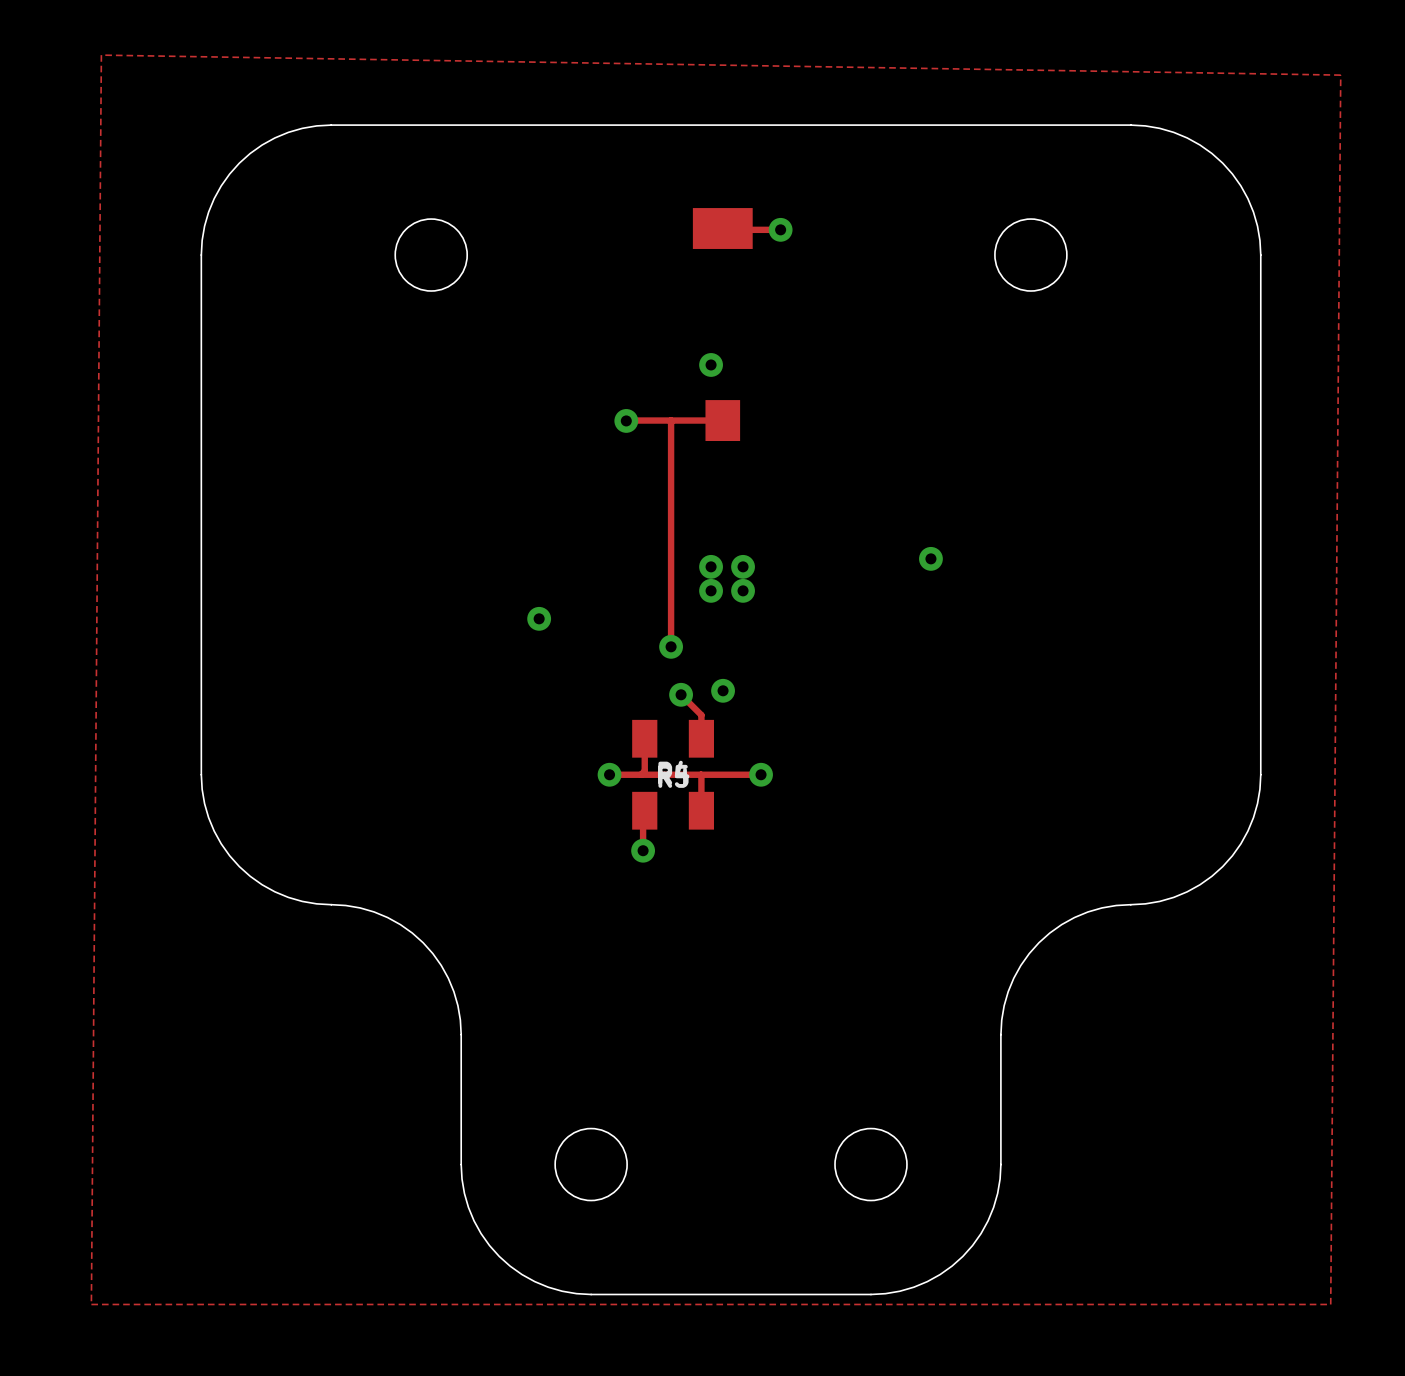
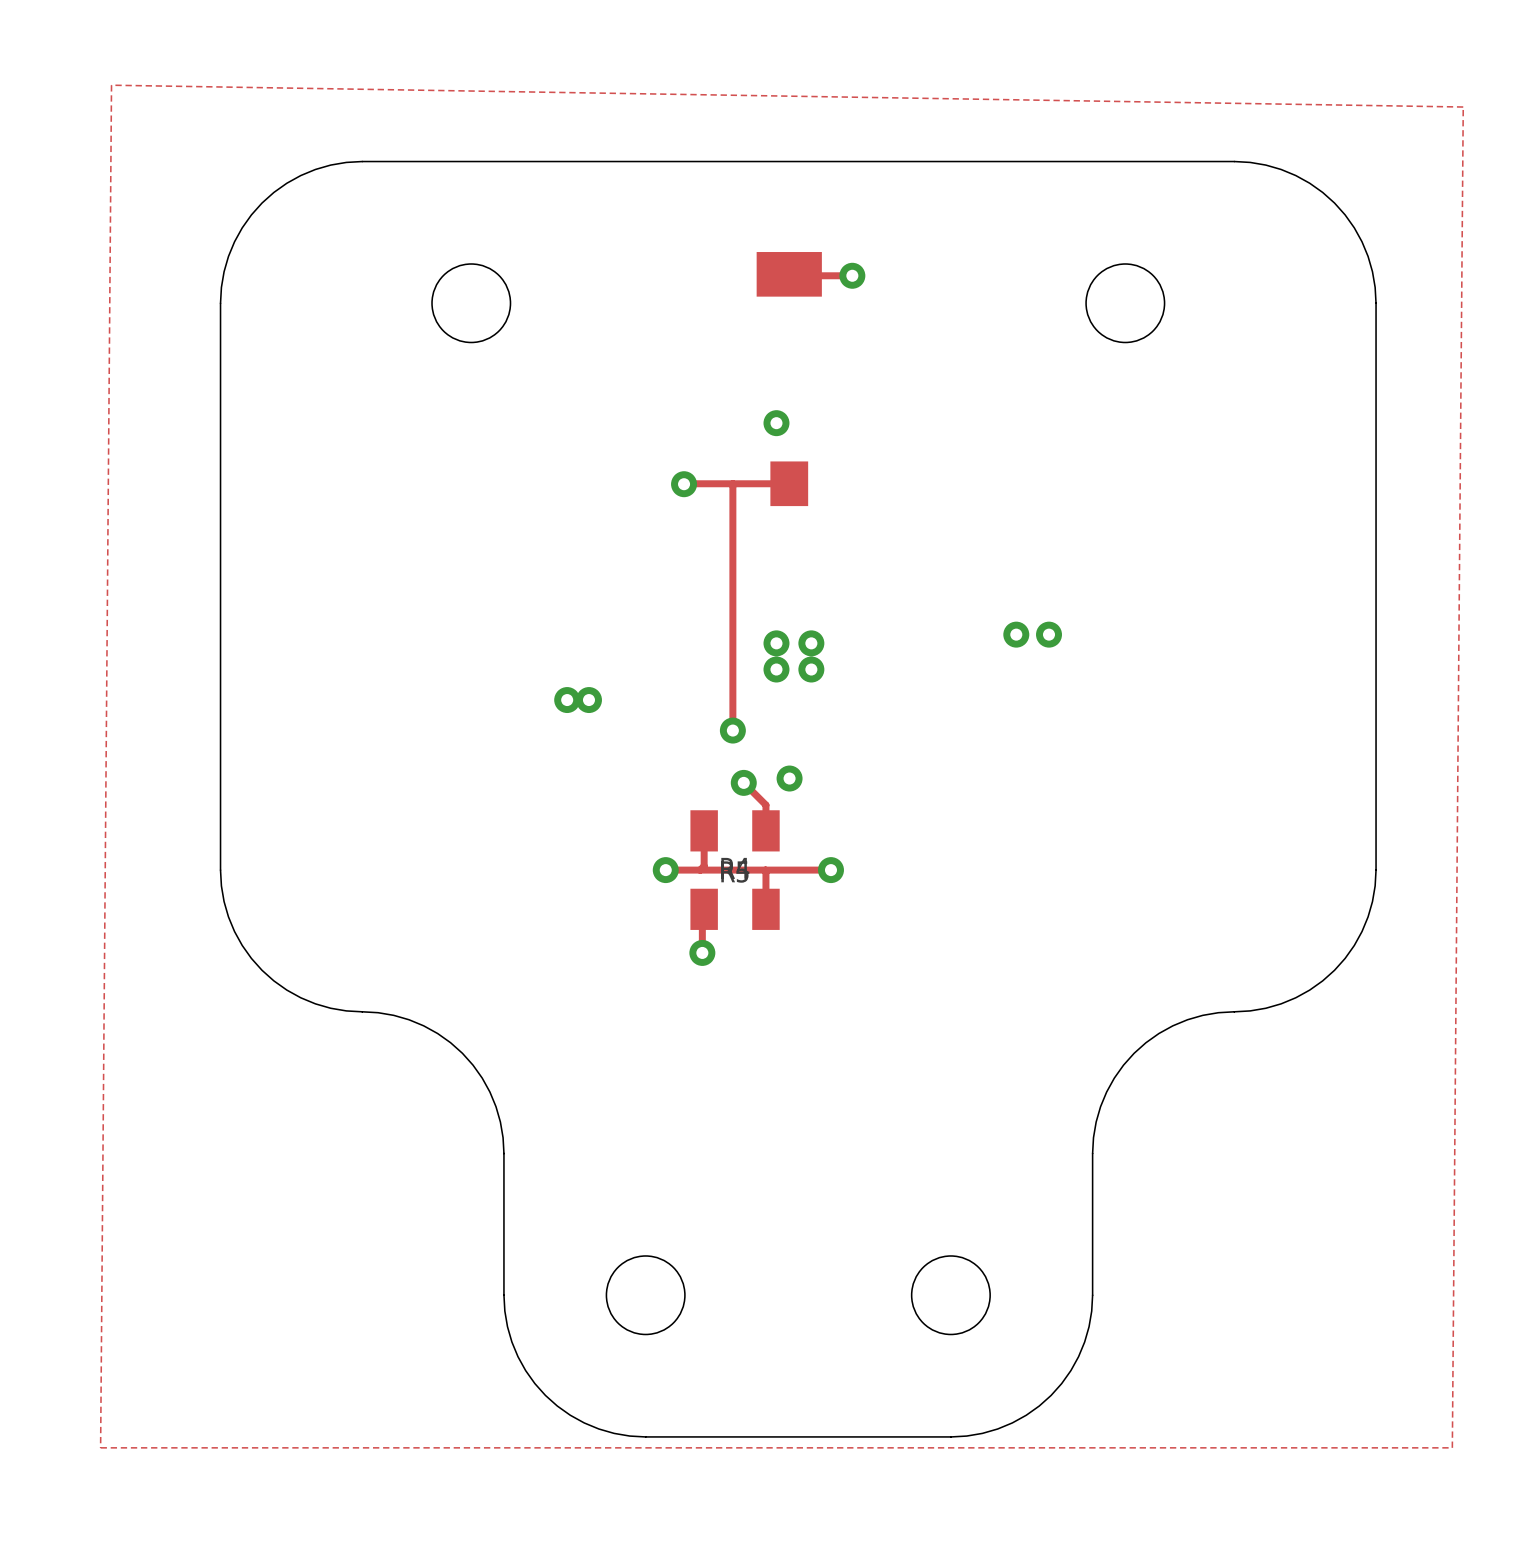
via: none -> (1049, 634)
via: none -> (567, 700)

